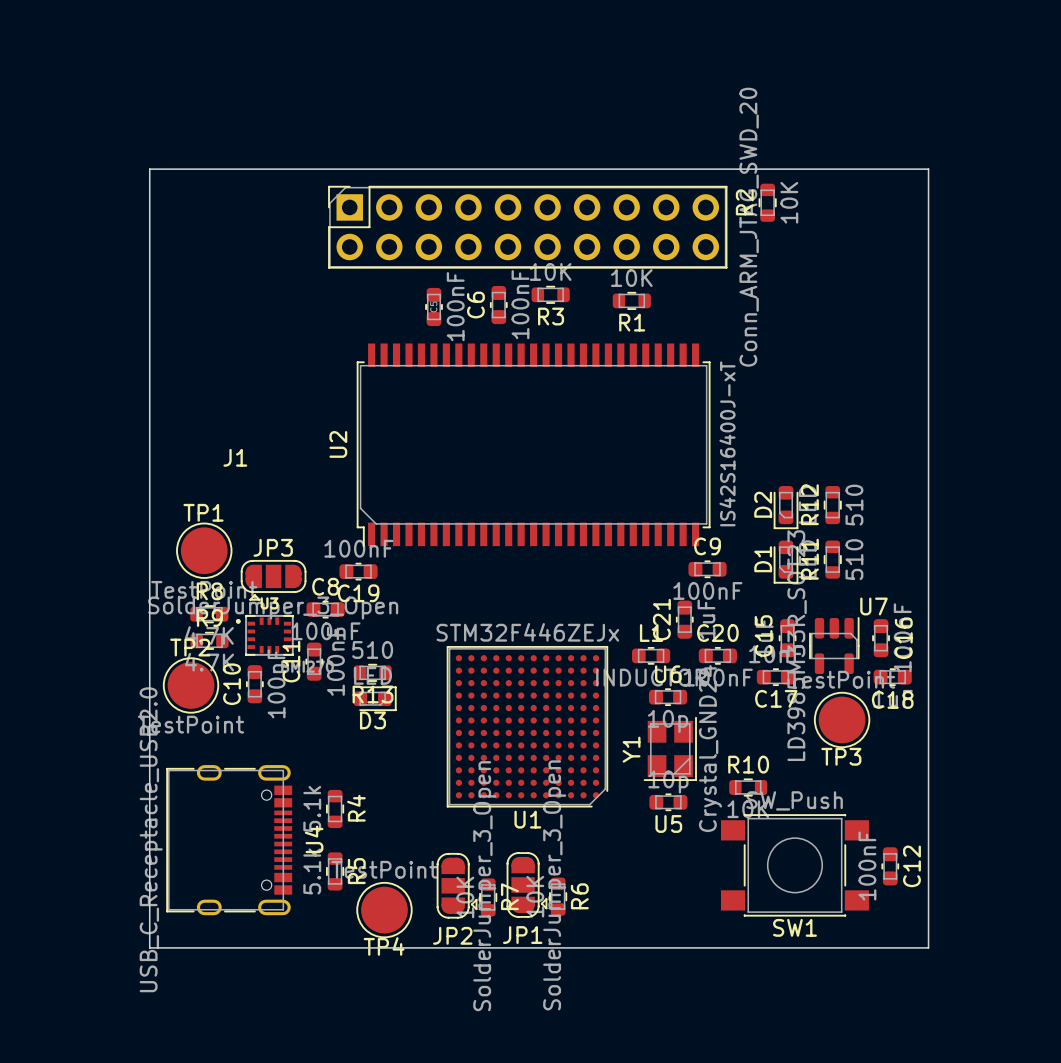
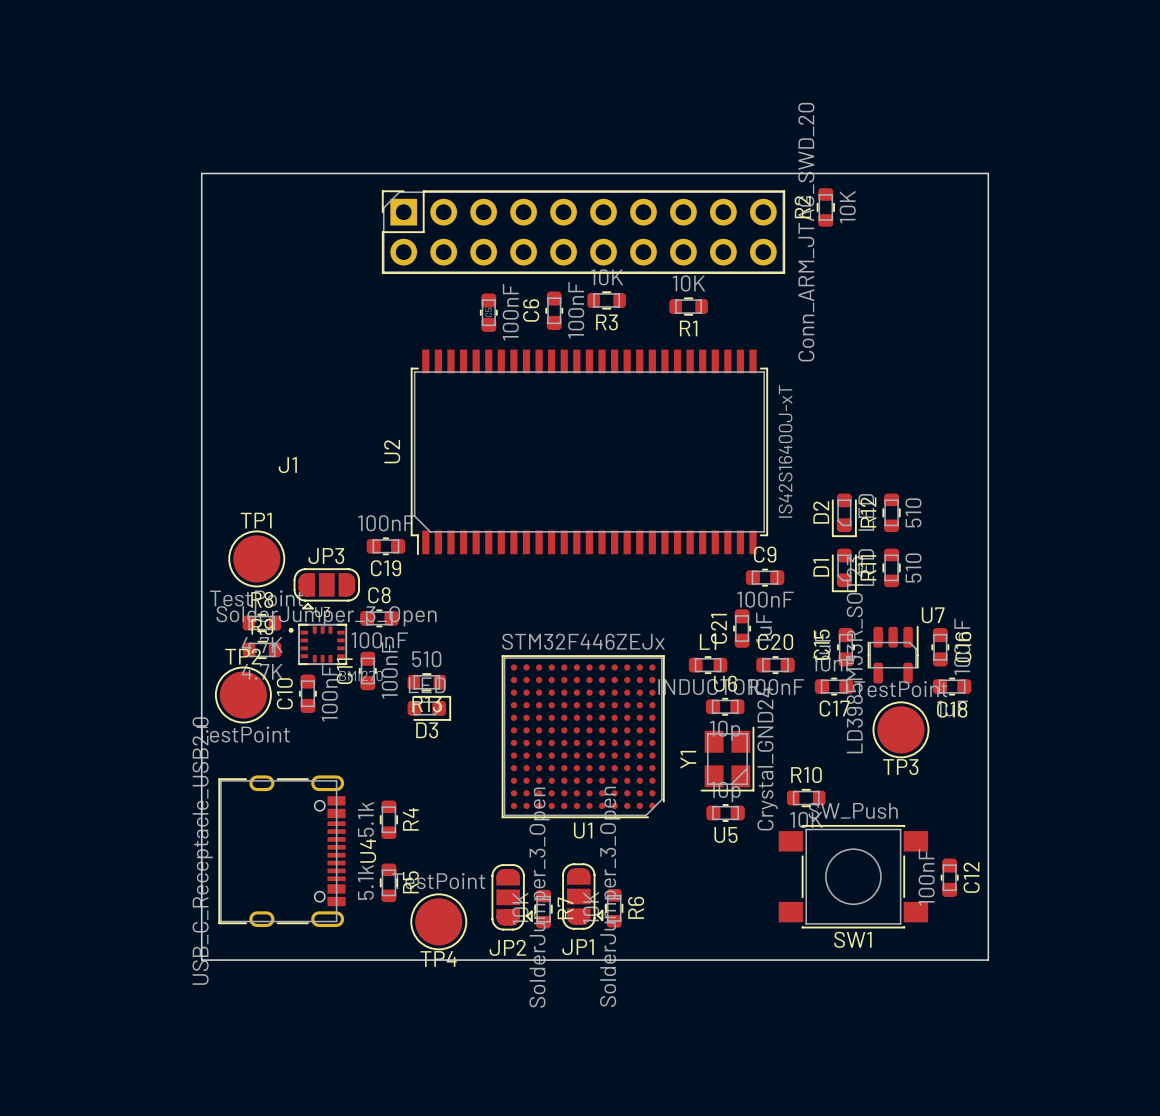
C19 position: (358, 571) -> (385, 546)

